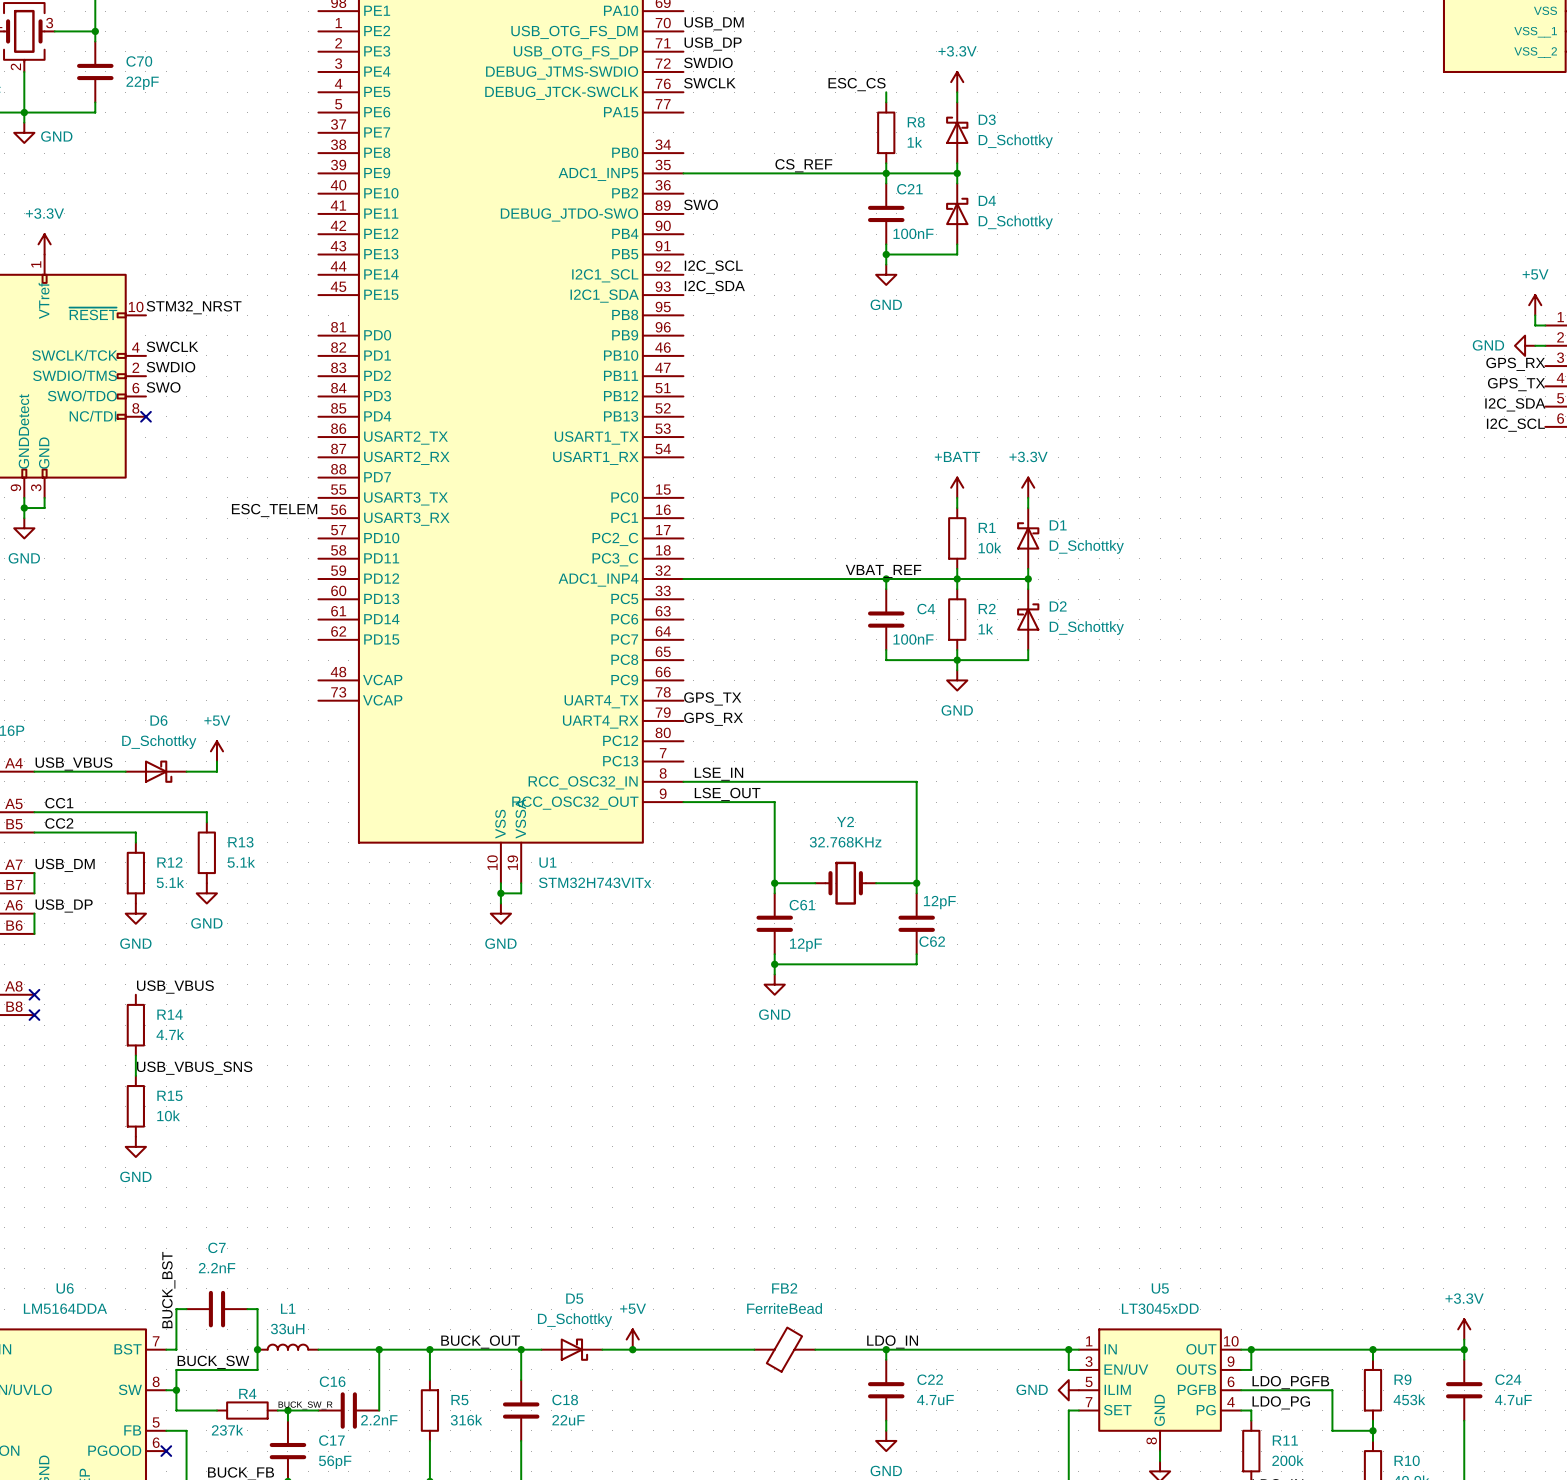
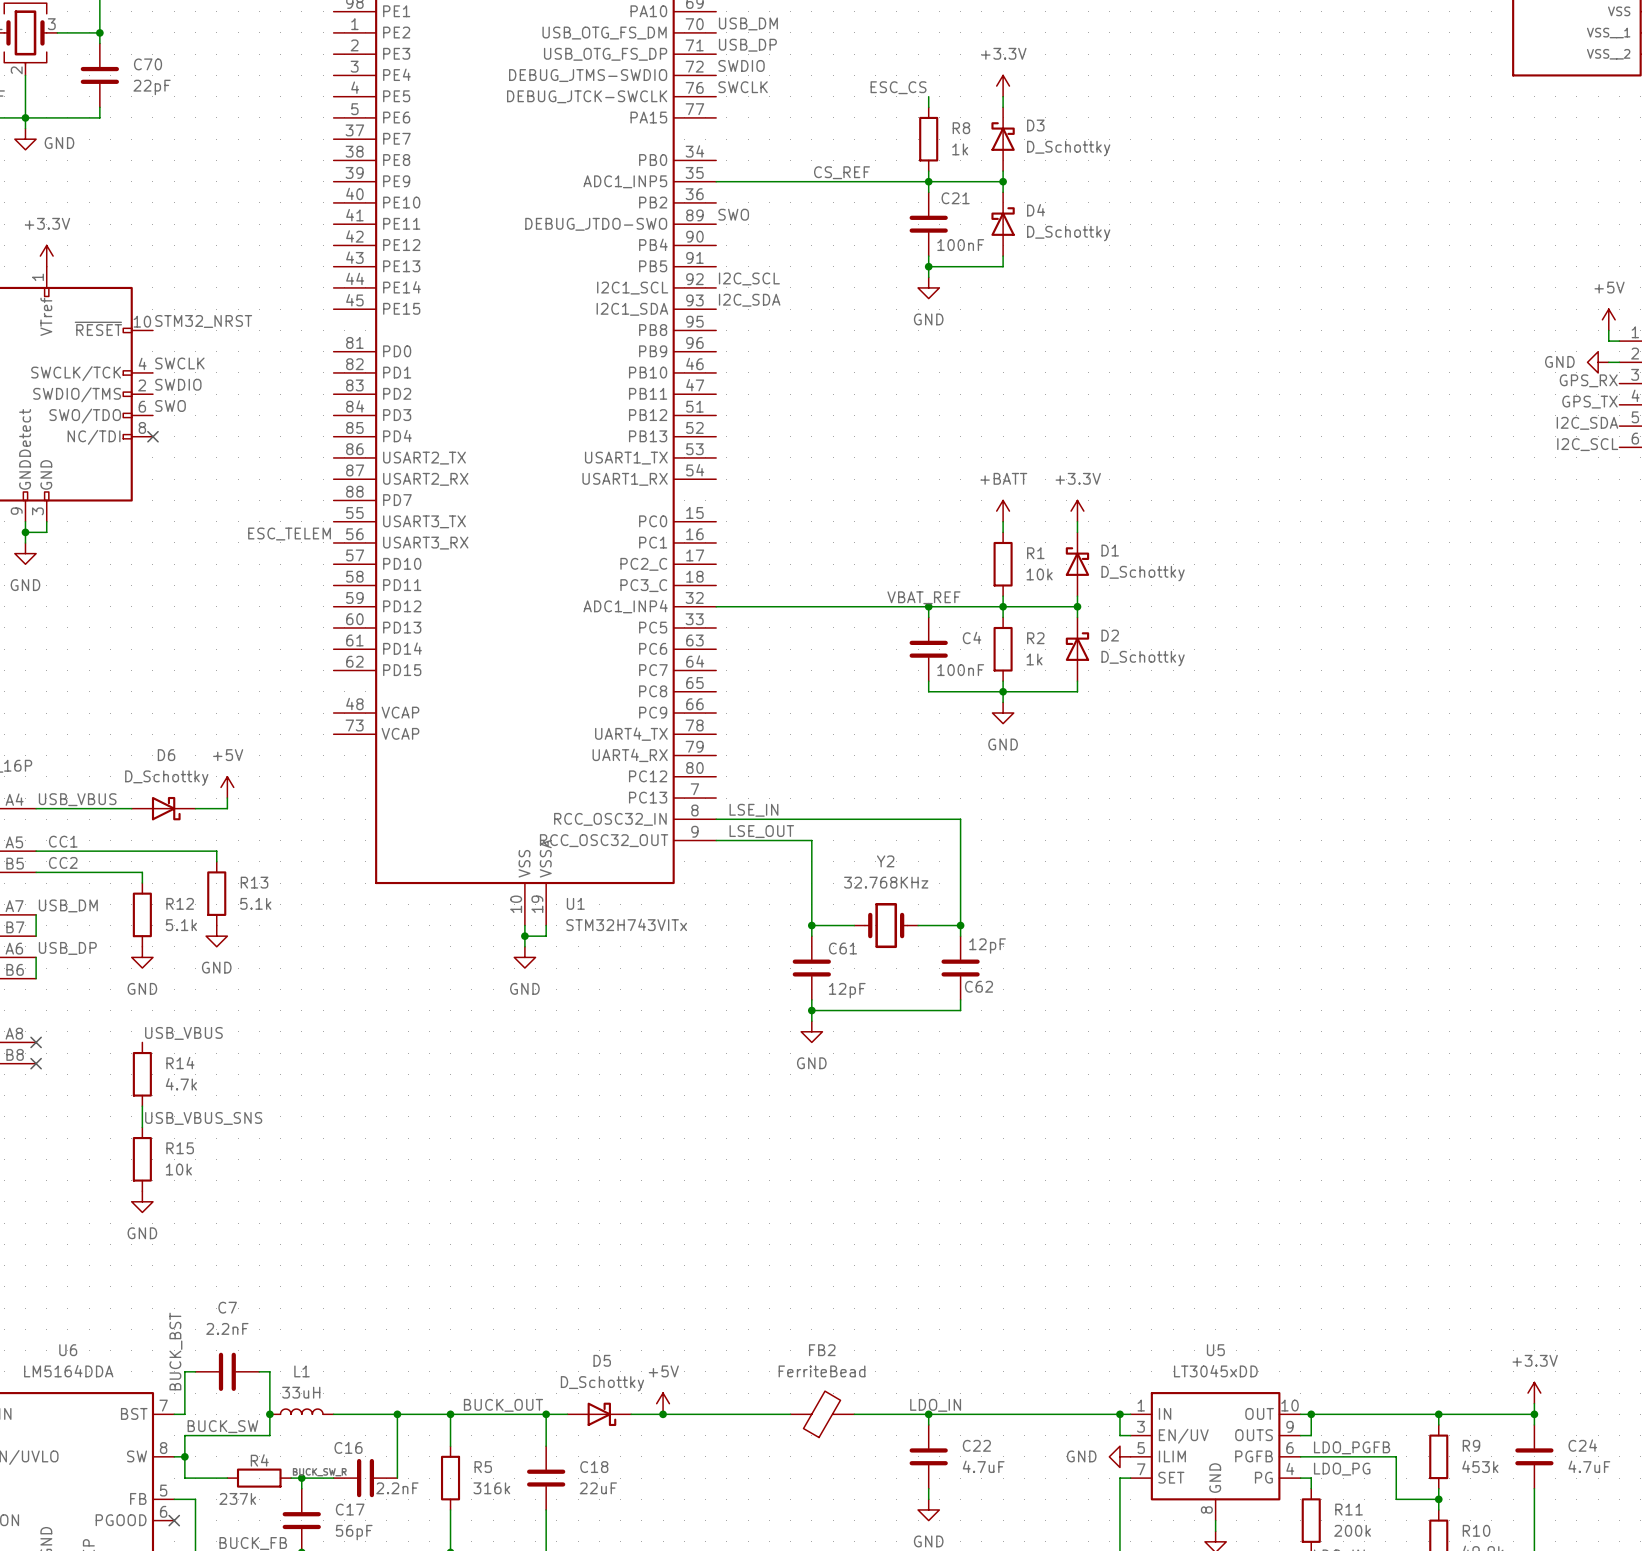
label: GPS_TX (712, 698) -> none
label: GPS_RX (713, 719) -> none

